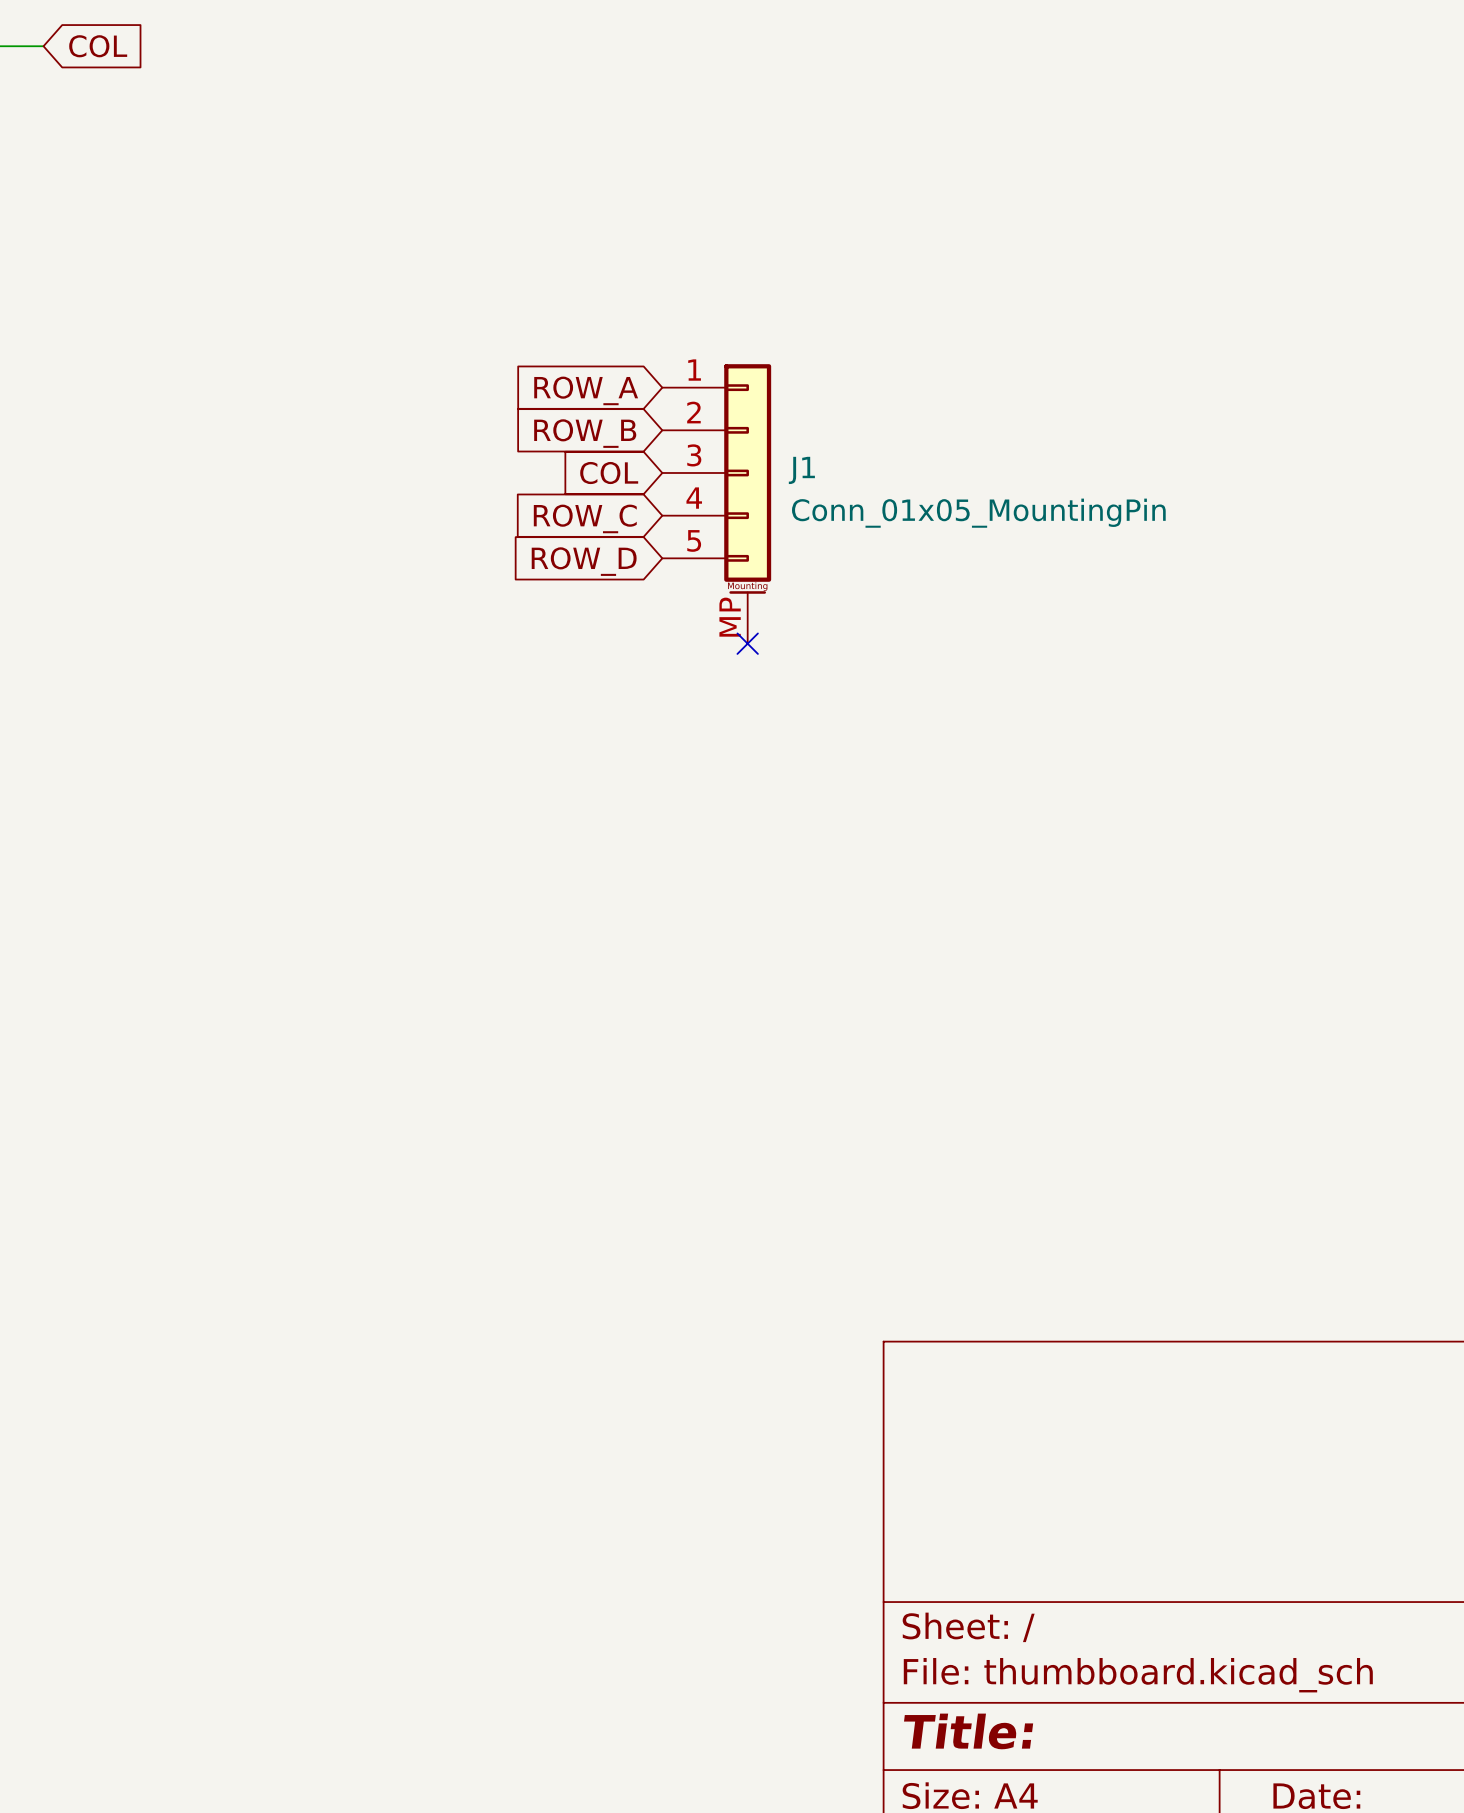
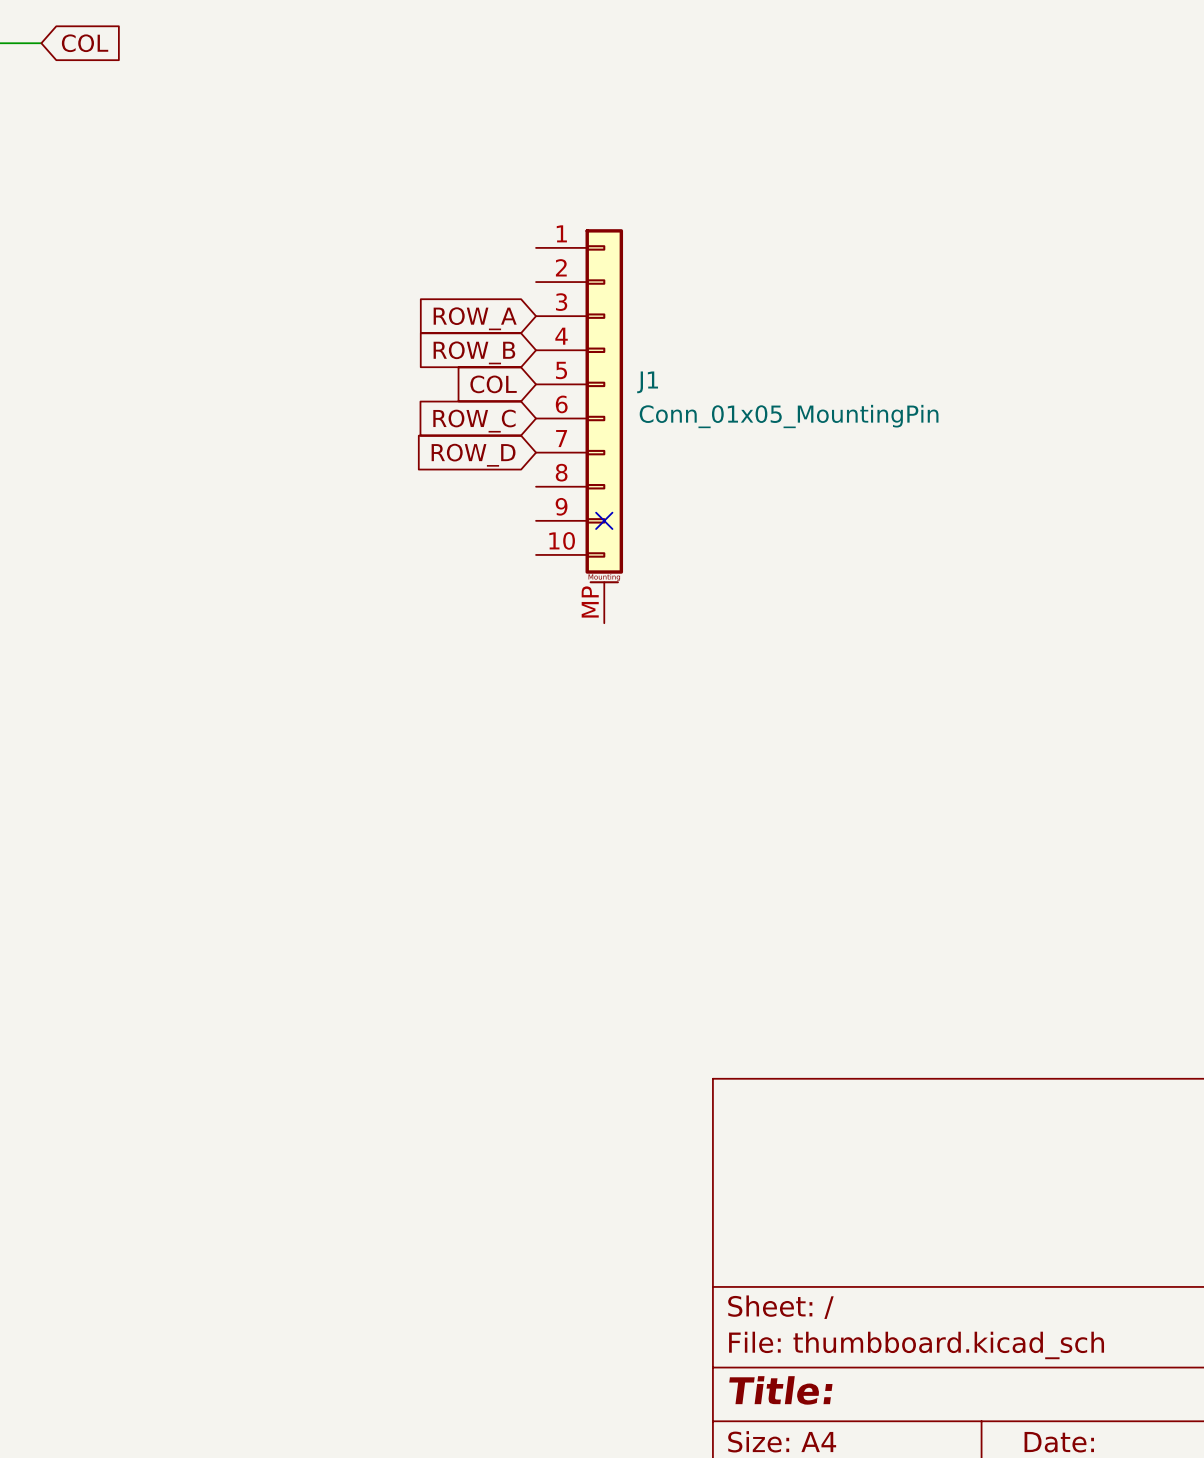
J1 symbol: [662, 364, 772, 644] -> [536, 229, 624, 624]

